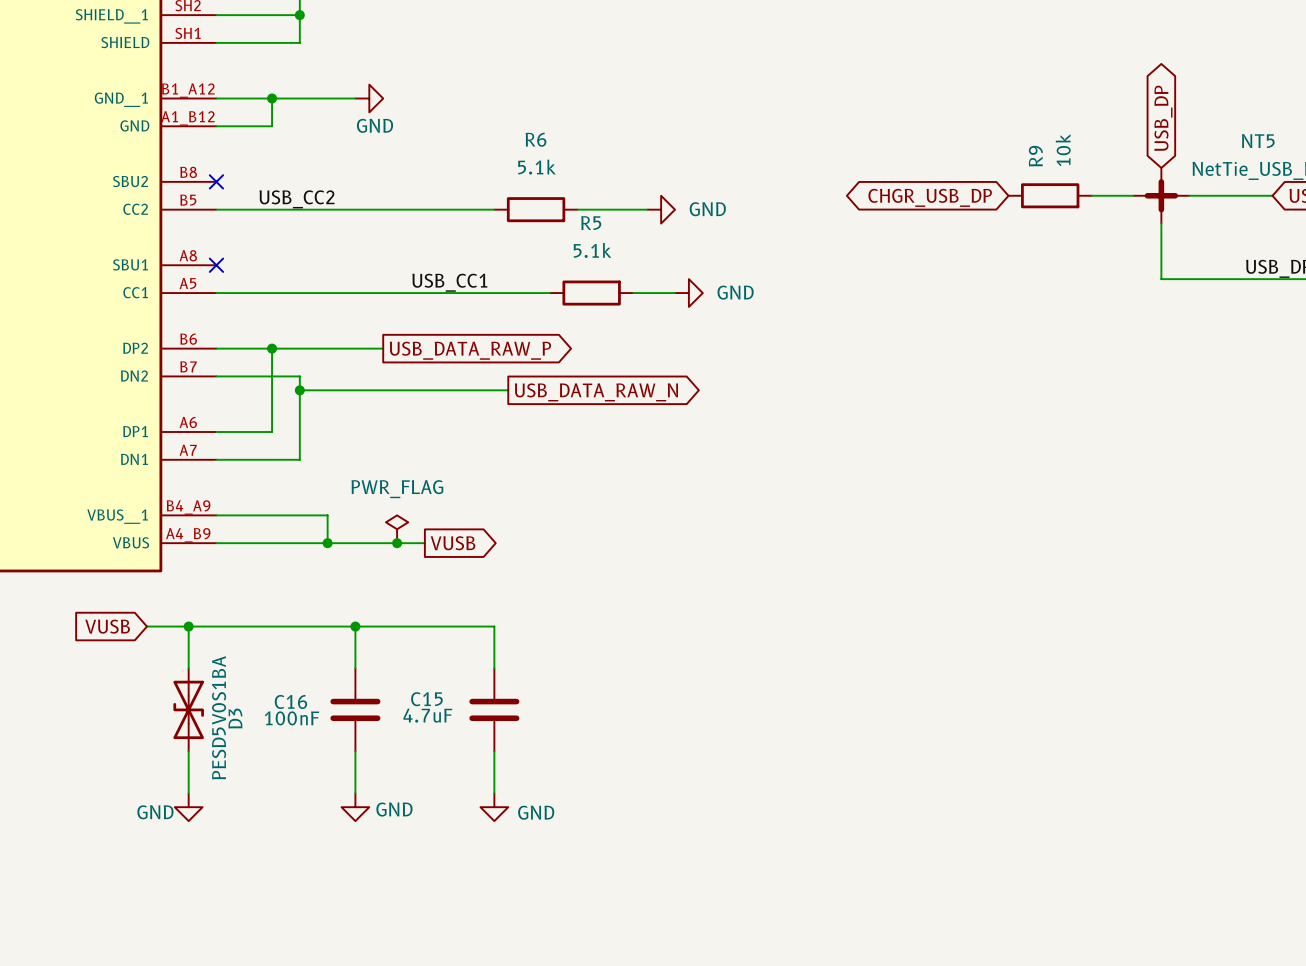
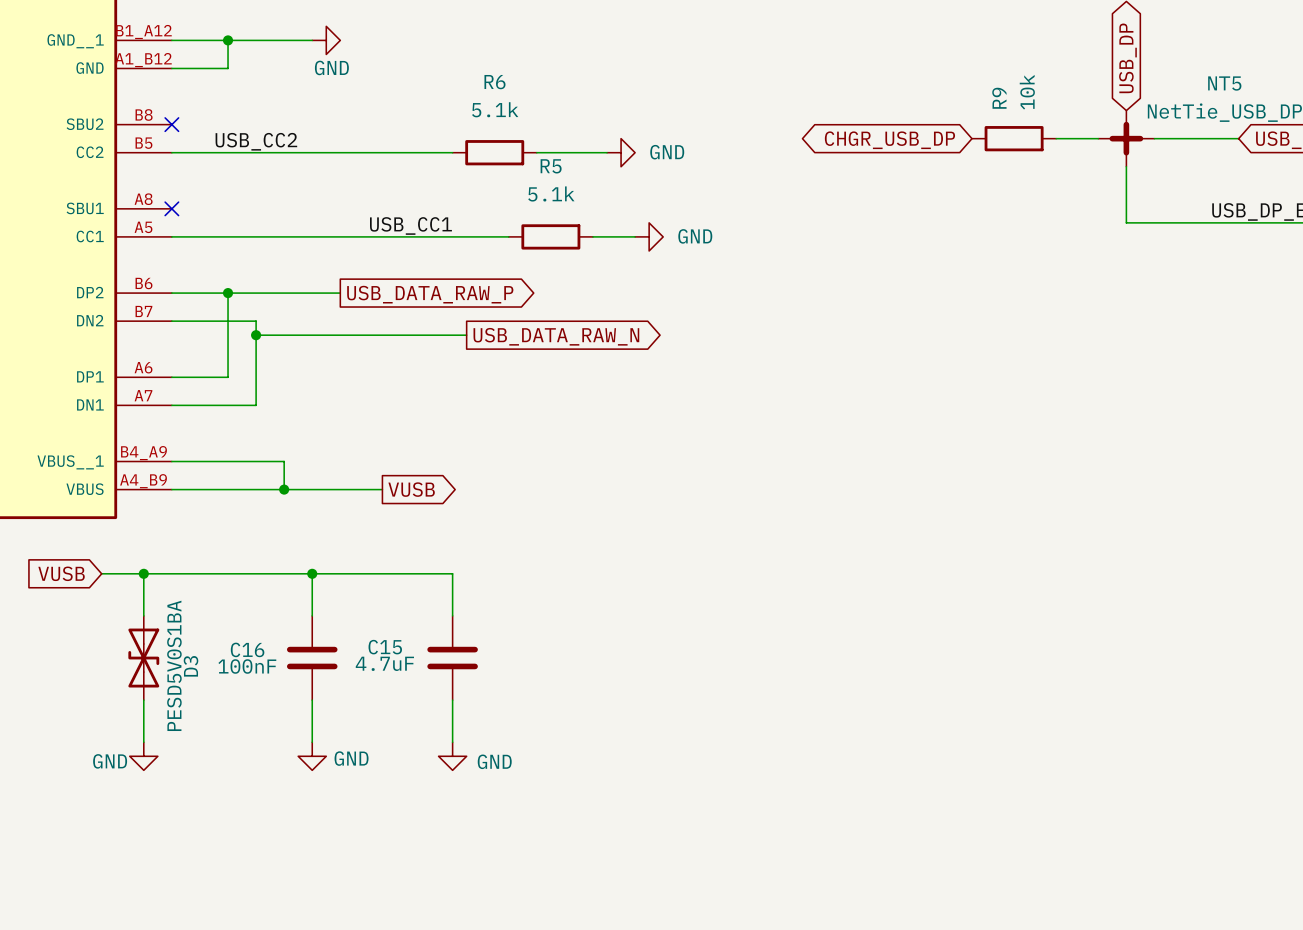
power symbol: PWR_FLAG (397, 529) -> none
junction: (397, 543) -> none

